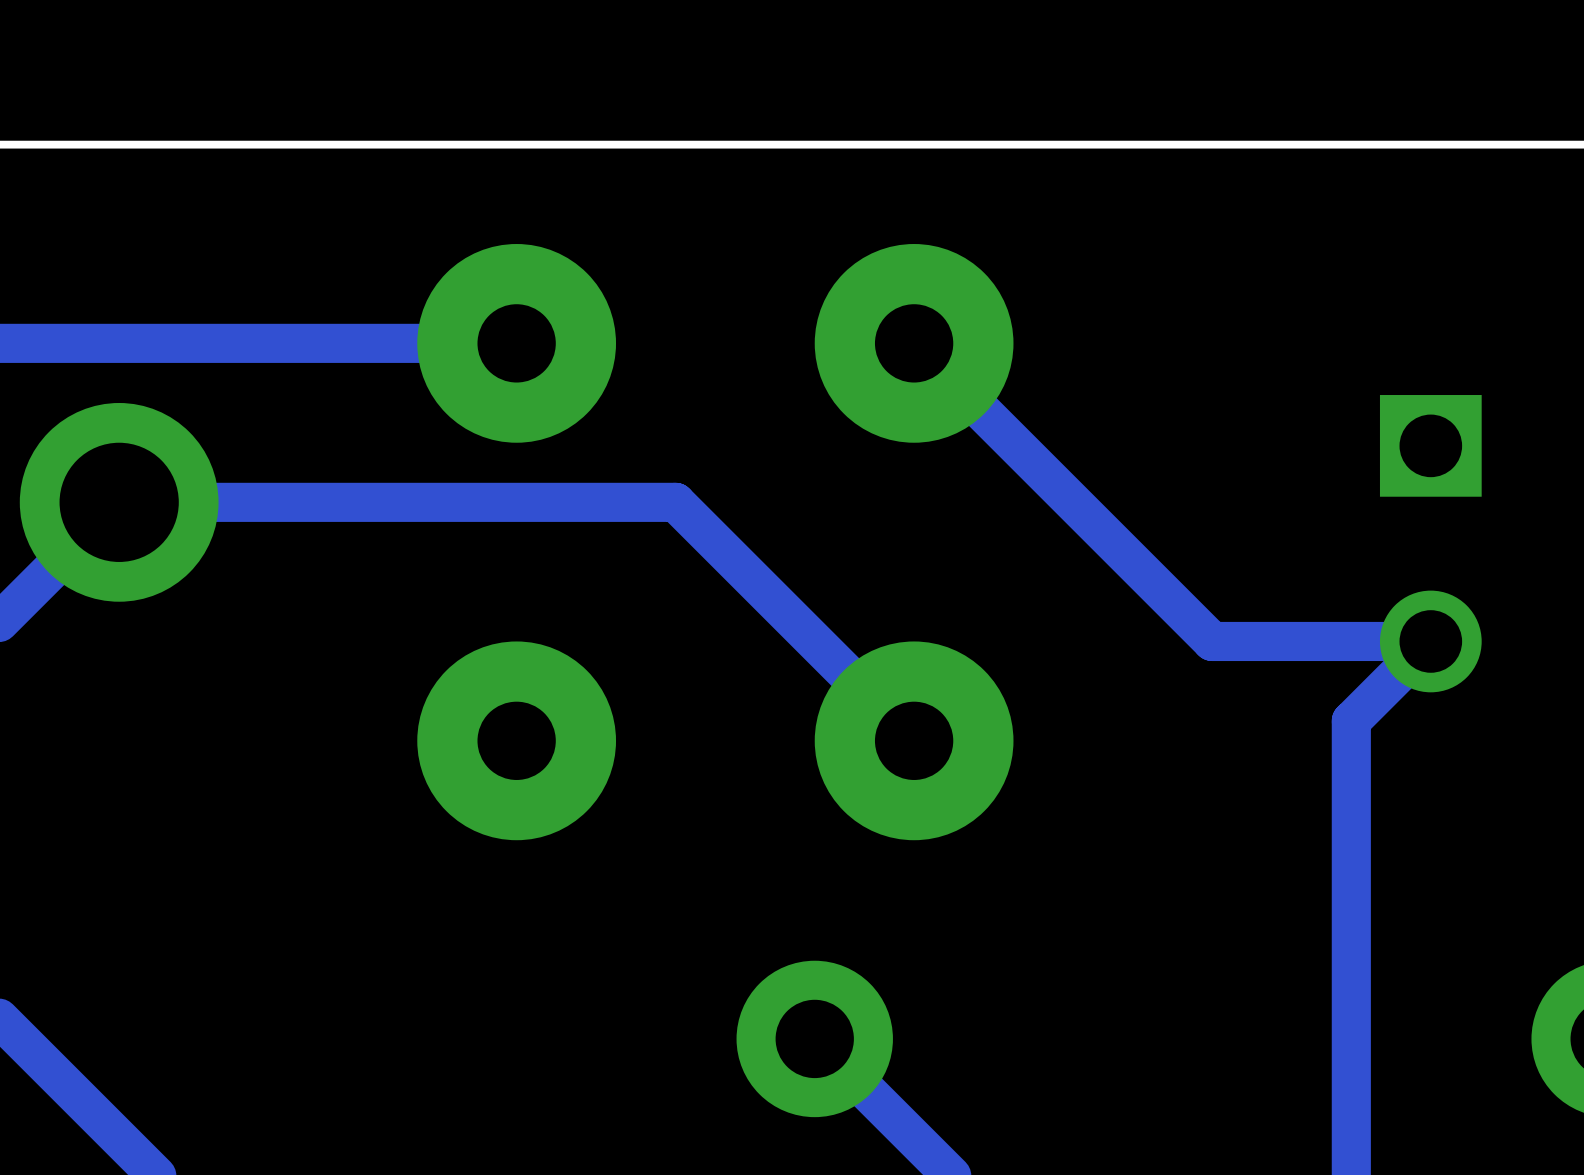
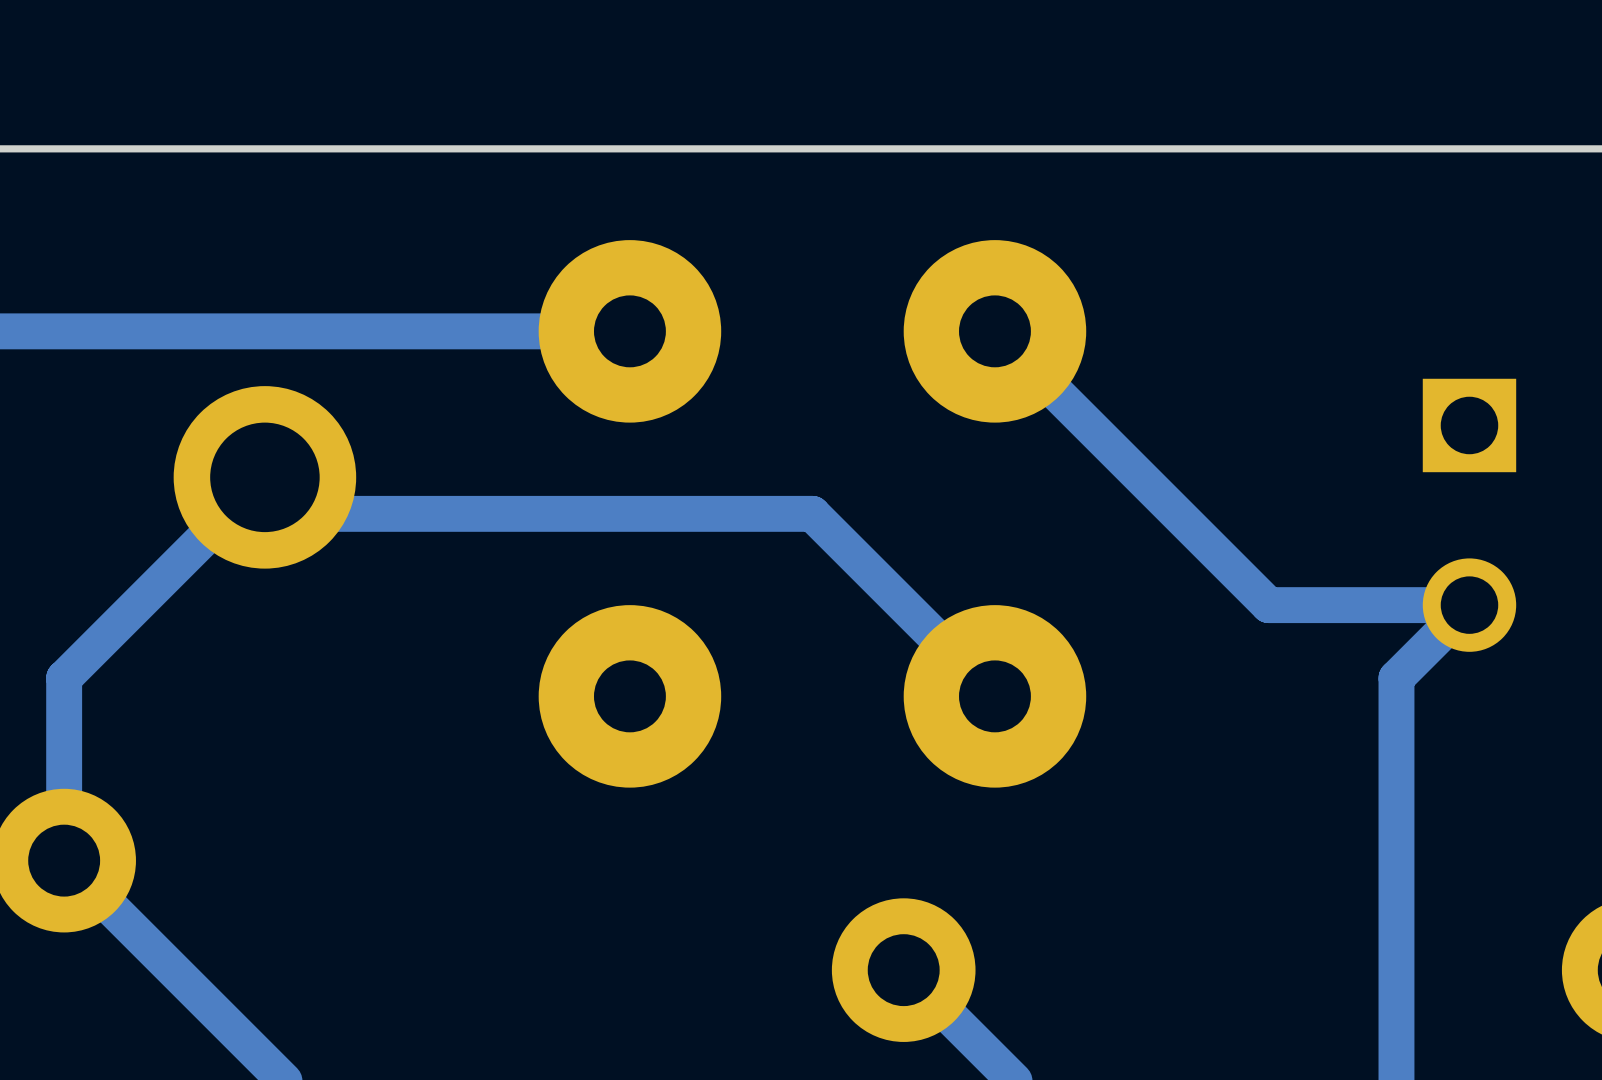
track: (119, 502) (675, 502) (715, 542) -> (264, 477) (301, 513) (812, 513)

